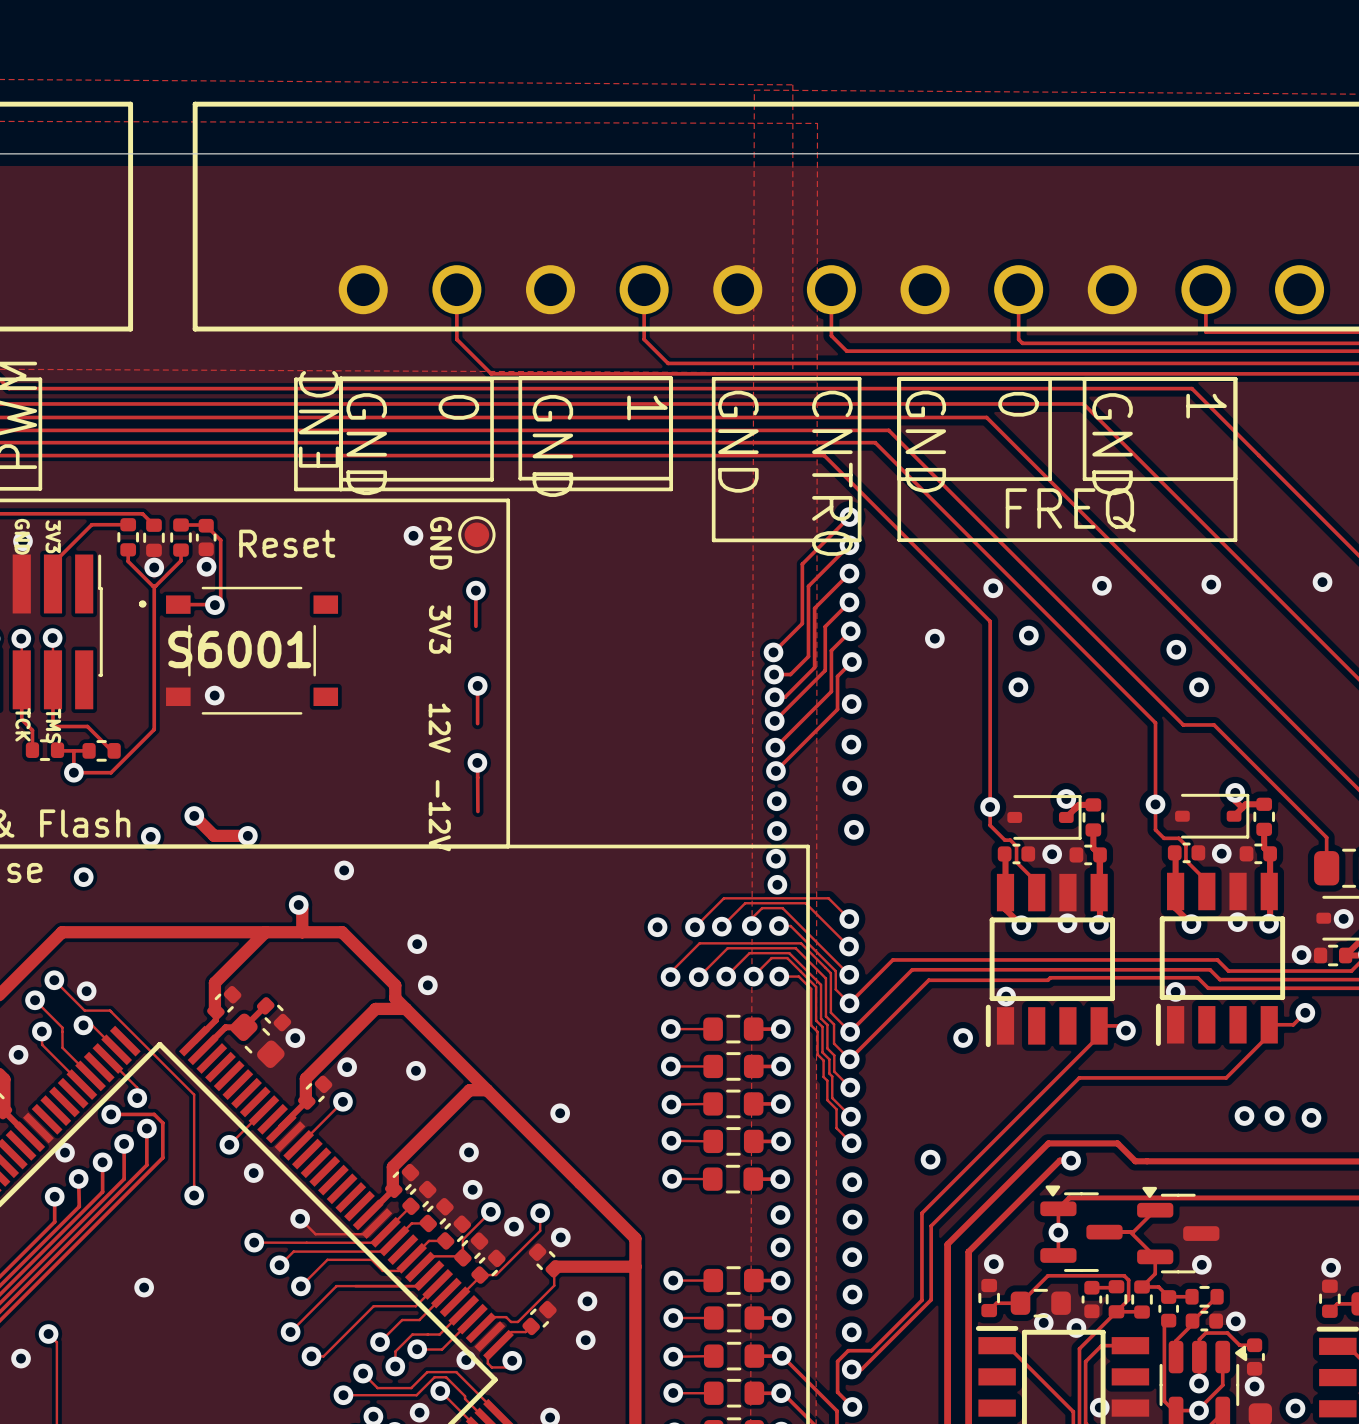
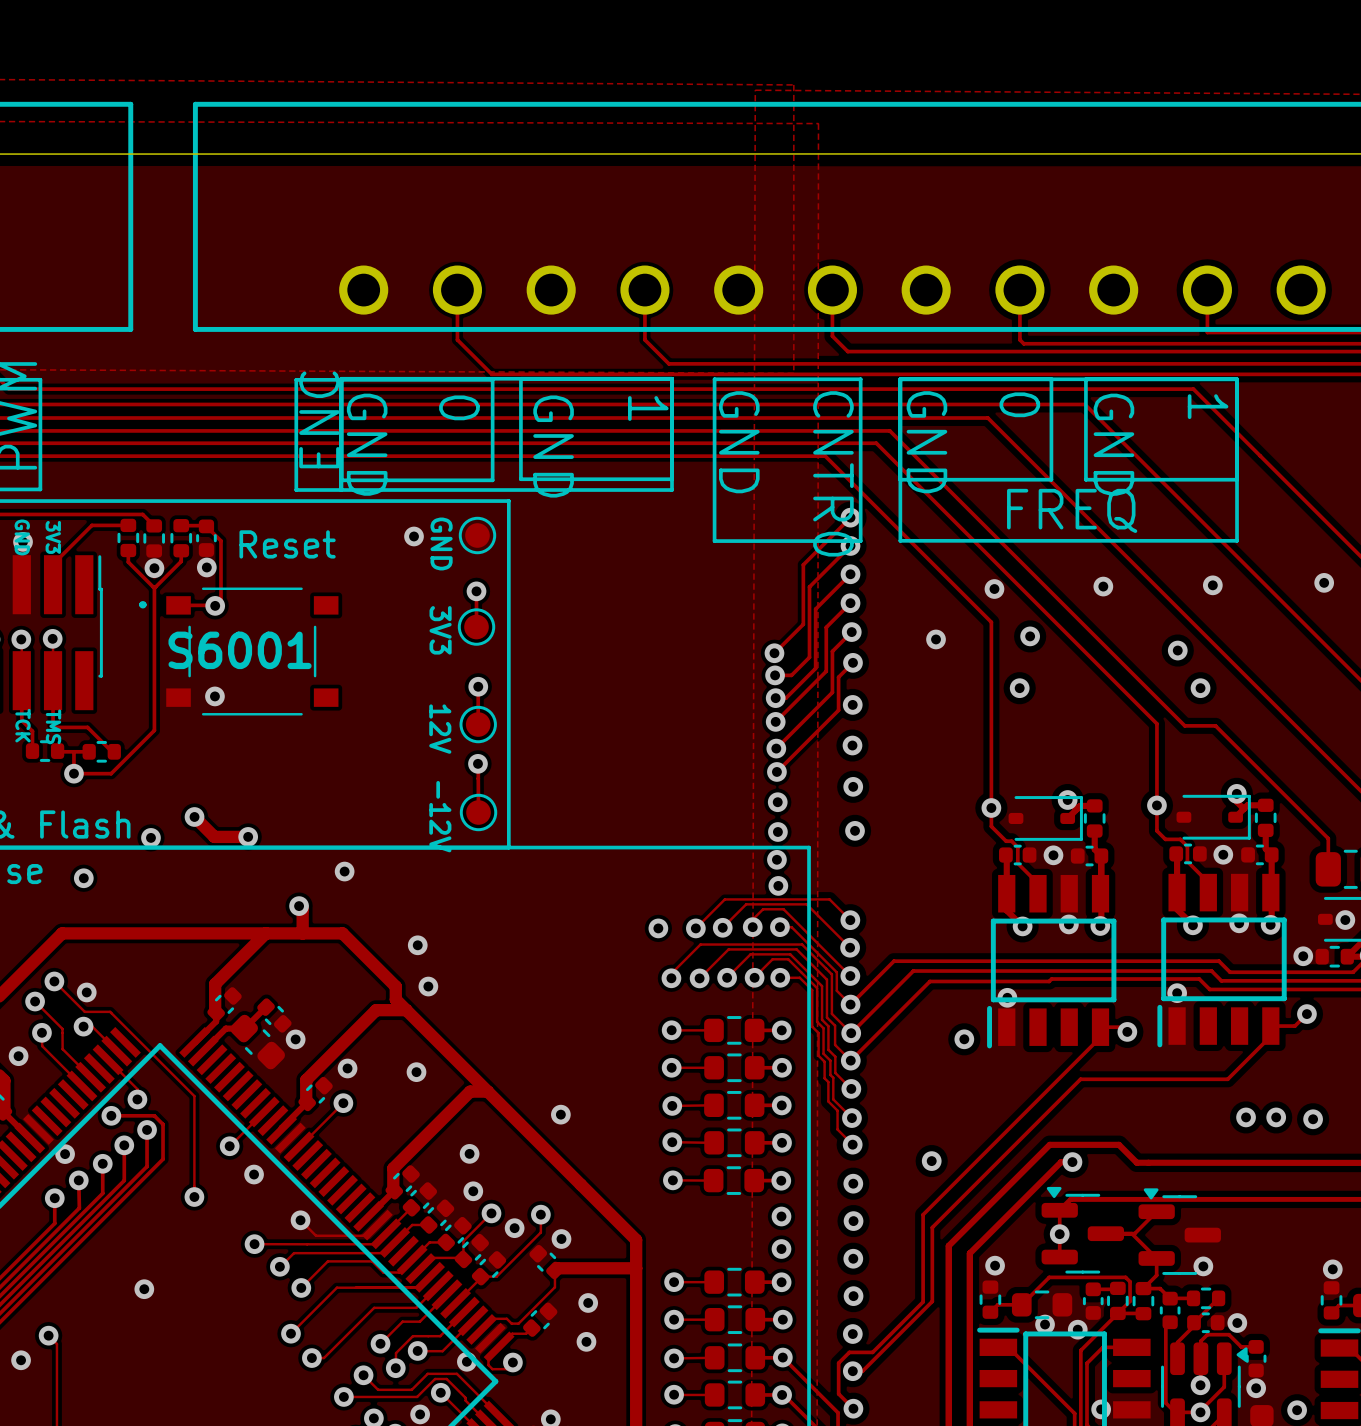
part: none -> (476, 627)
part: none -> (478, 724)
part: none -> (478, 812)

